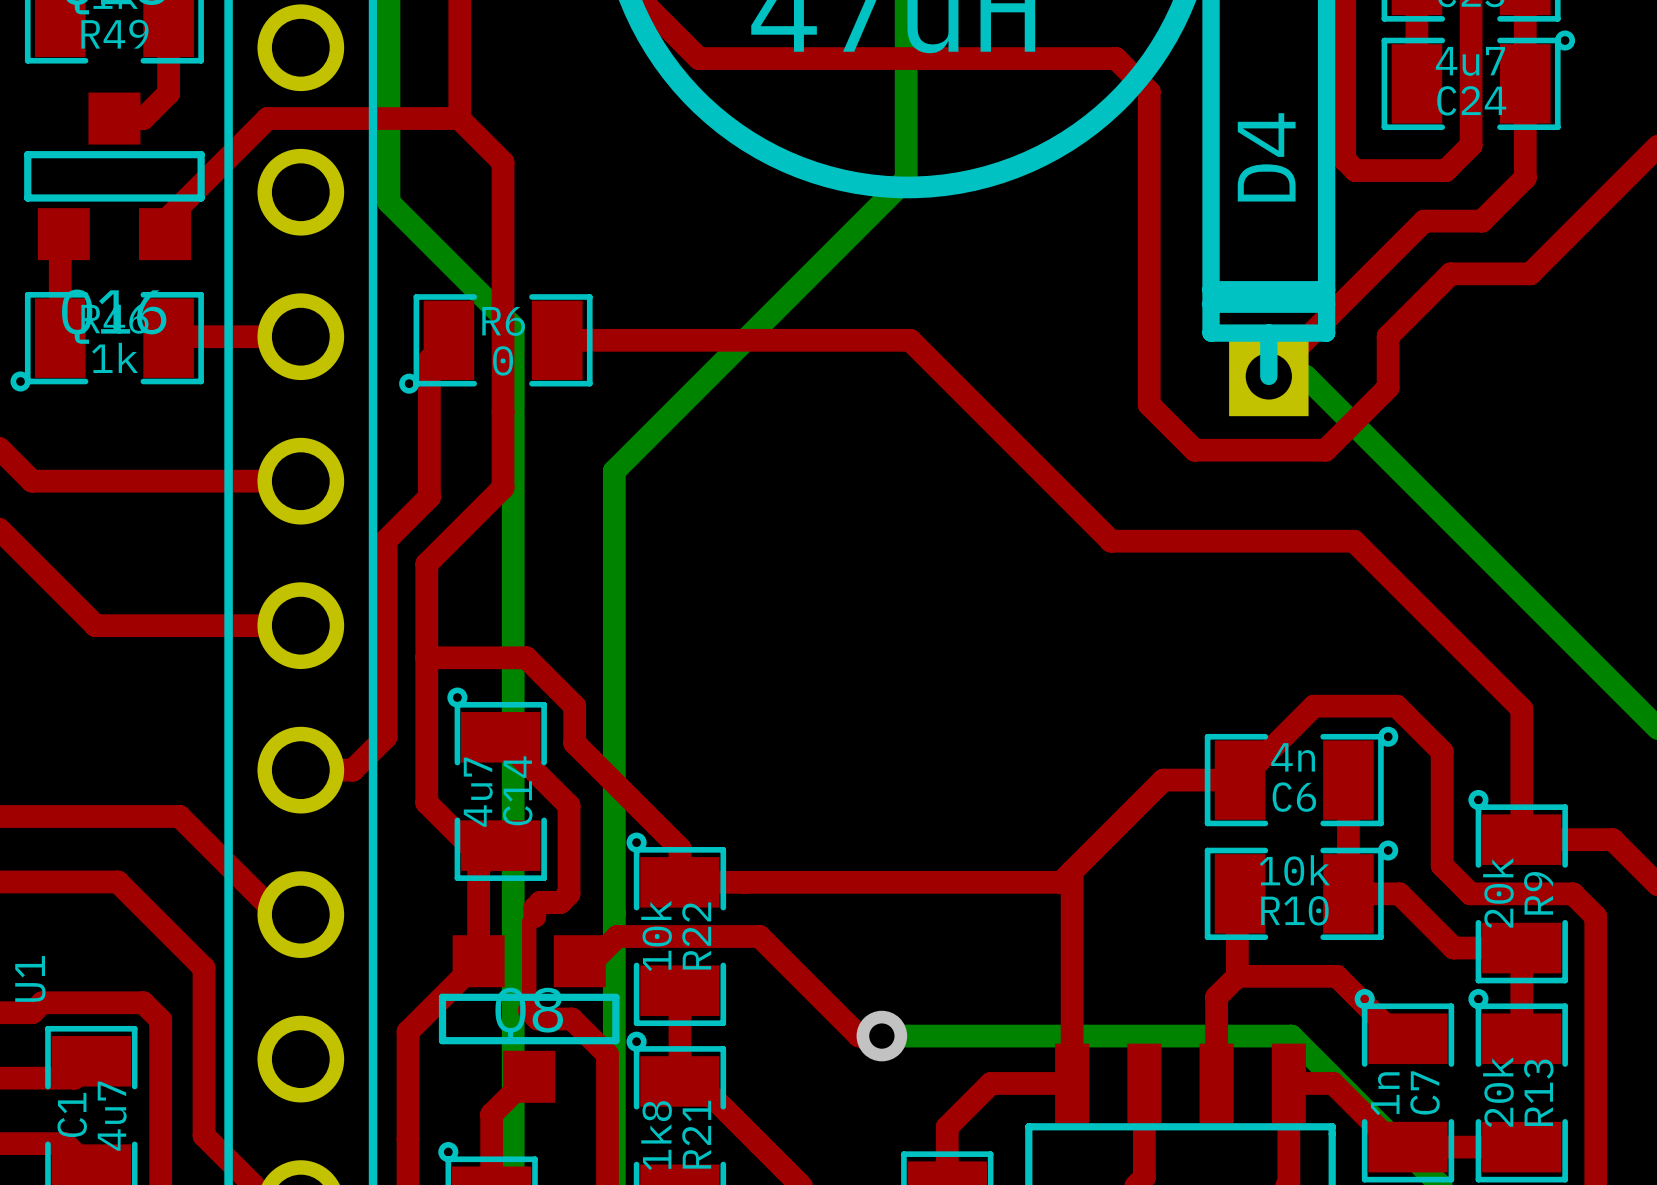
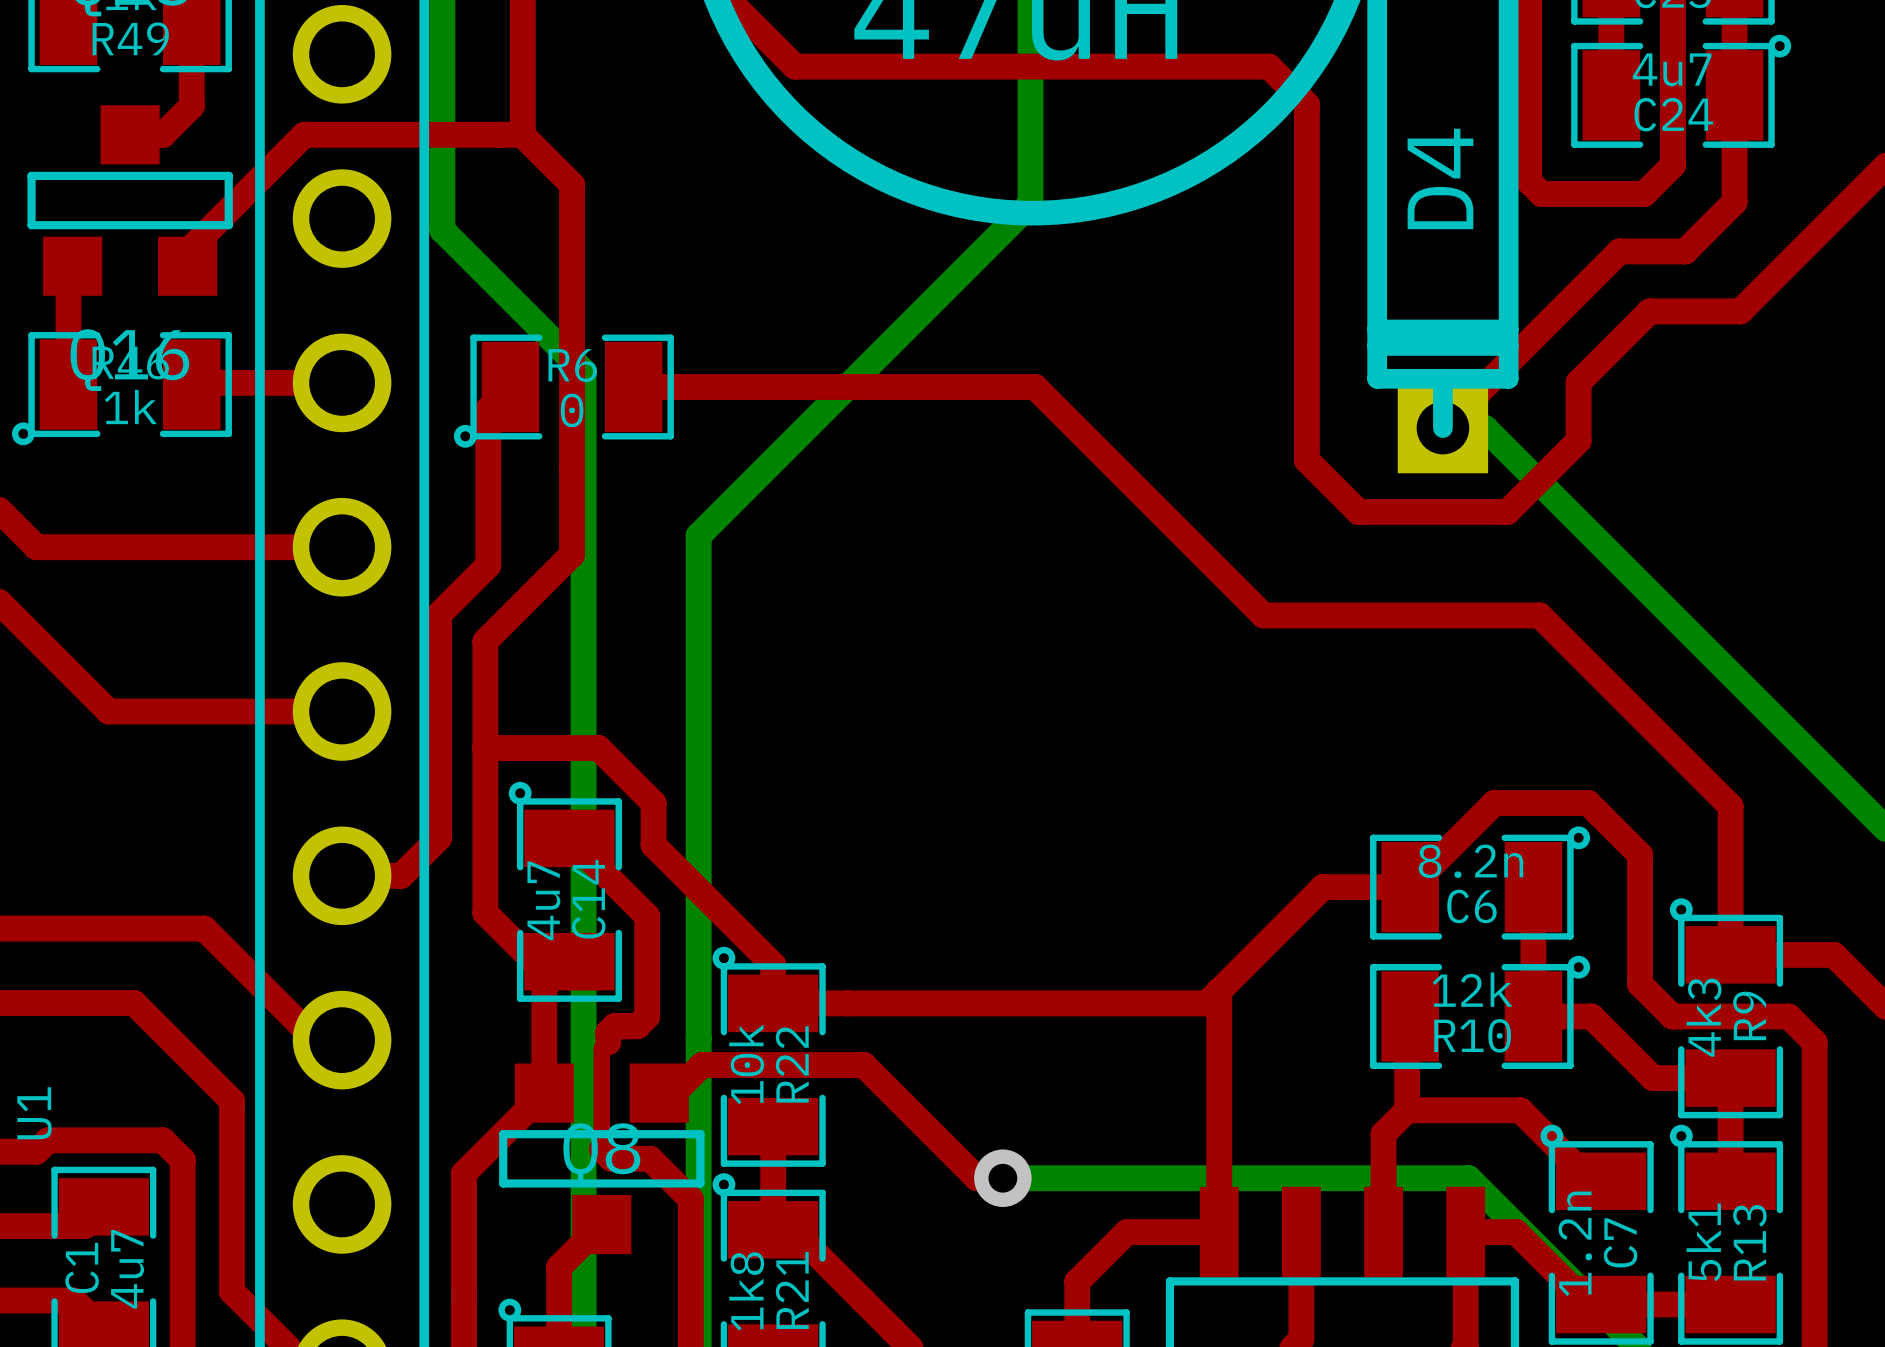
C6 value: 4n (1293, 757) -> 8.2n (1470, 861)
R10 value: 10k (1294, 870) -> 12k (1472, 989)
R9 value: 20k (1498, 893) -> 4k3 (1704, 1017)
R13 value: 20k (1498, 1092) -> 5k1 (1704, 1242)
C7 value: 1n (1385, 1093) -> 1.2n (1575, 1243)

